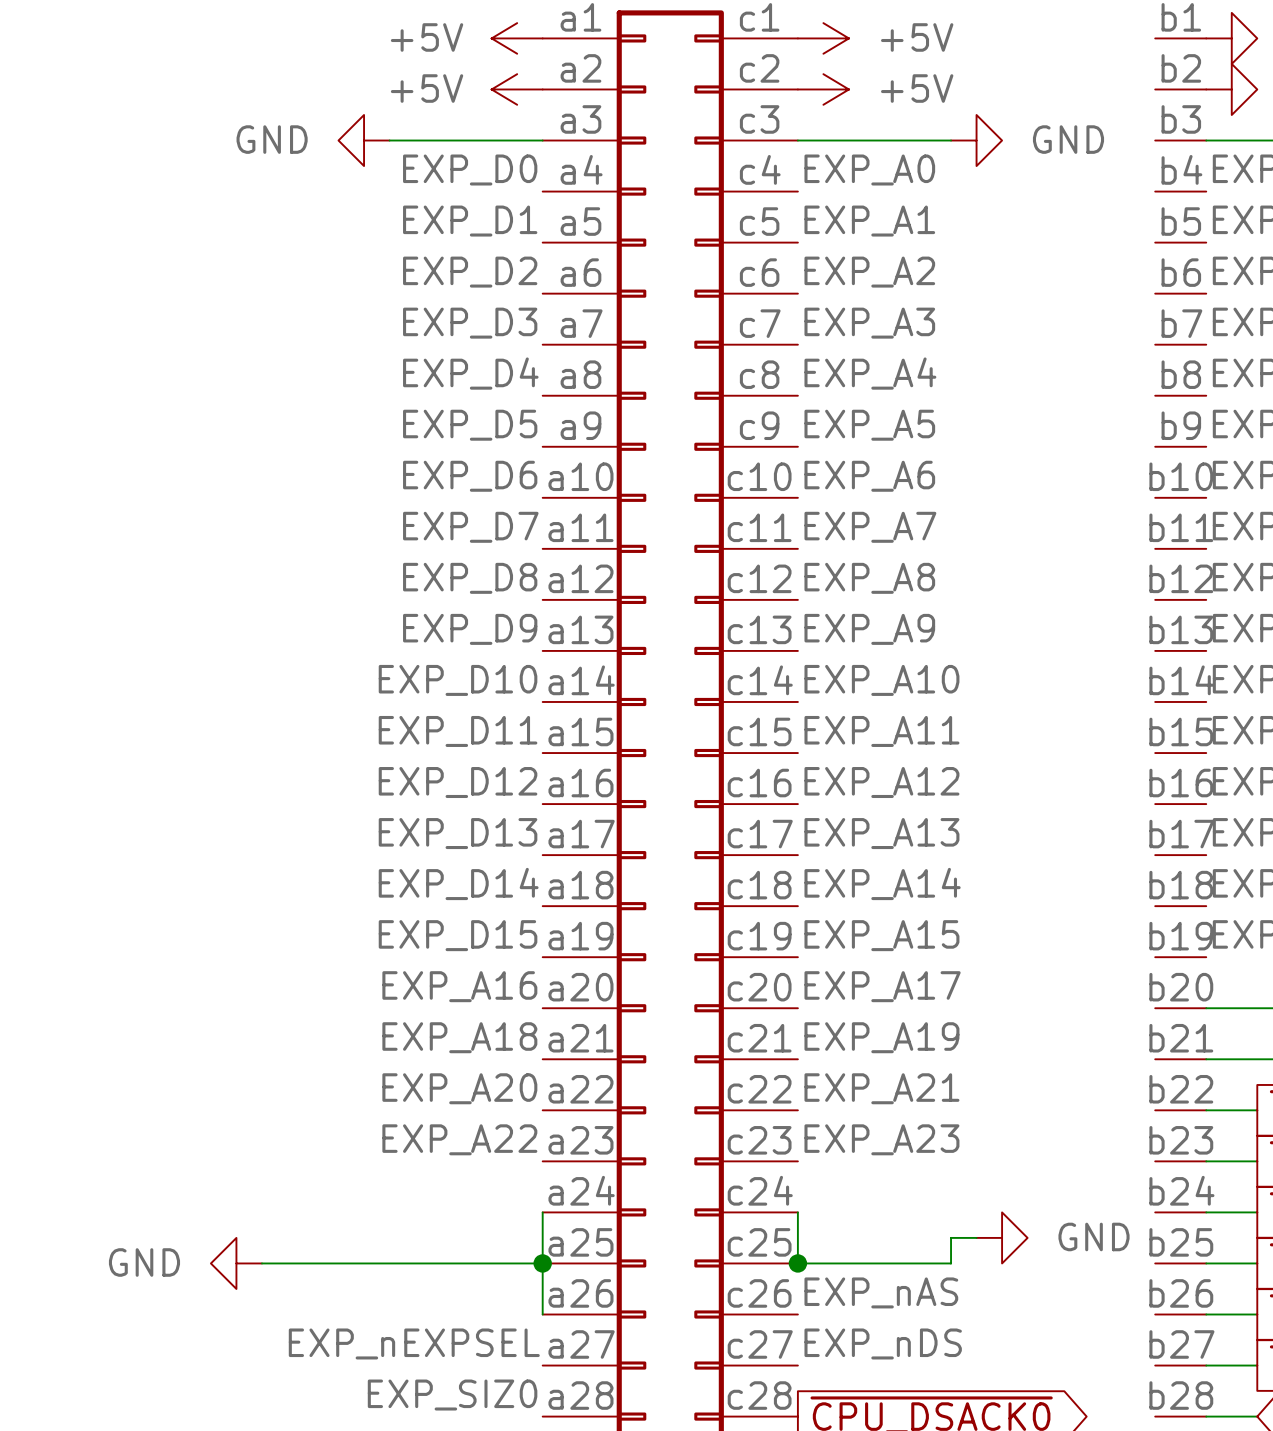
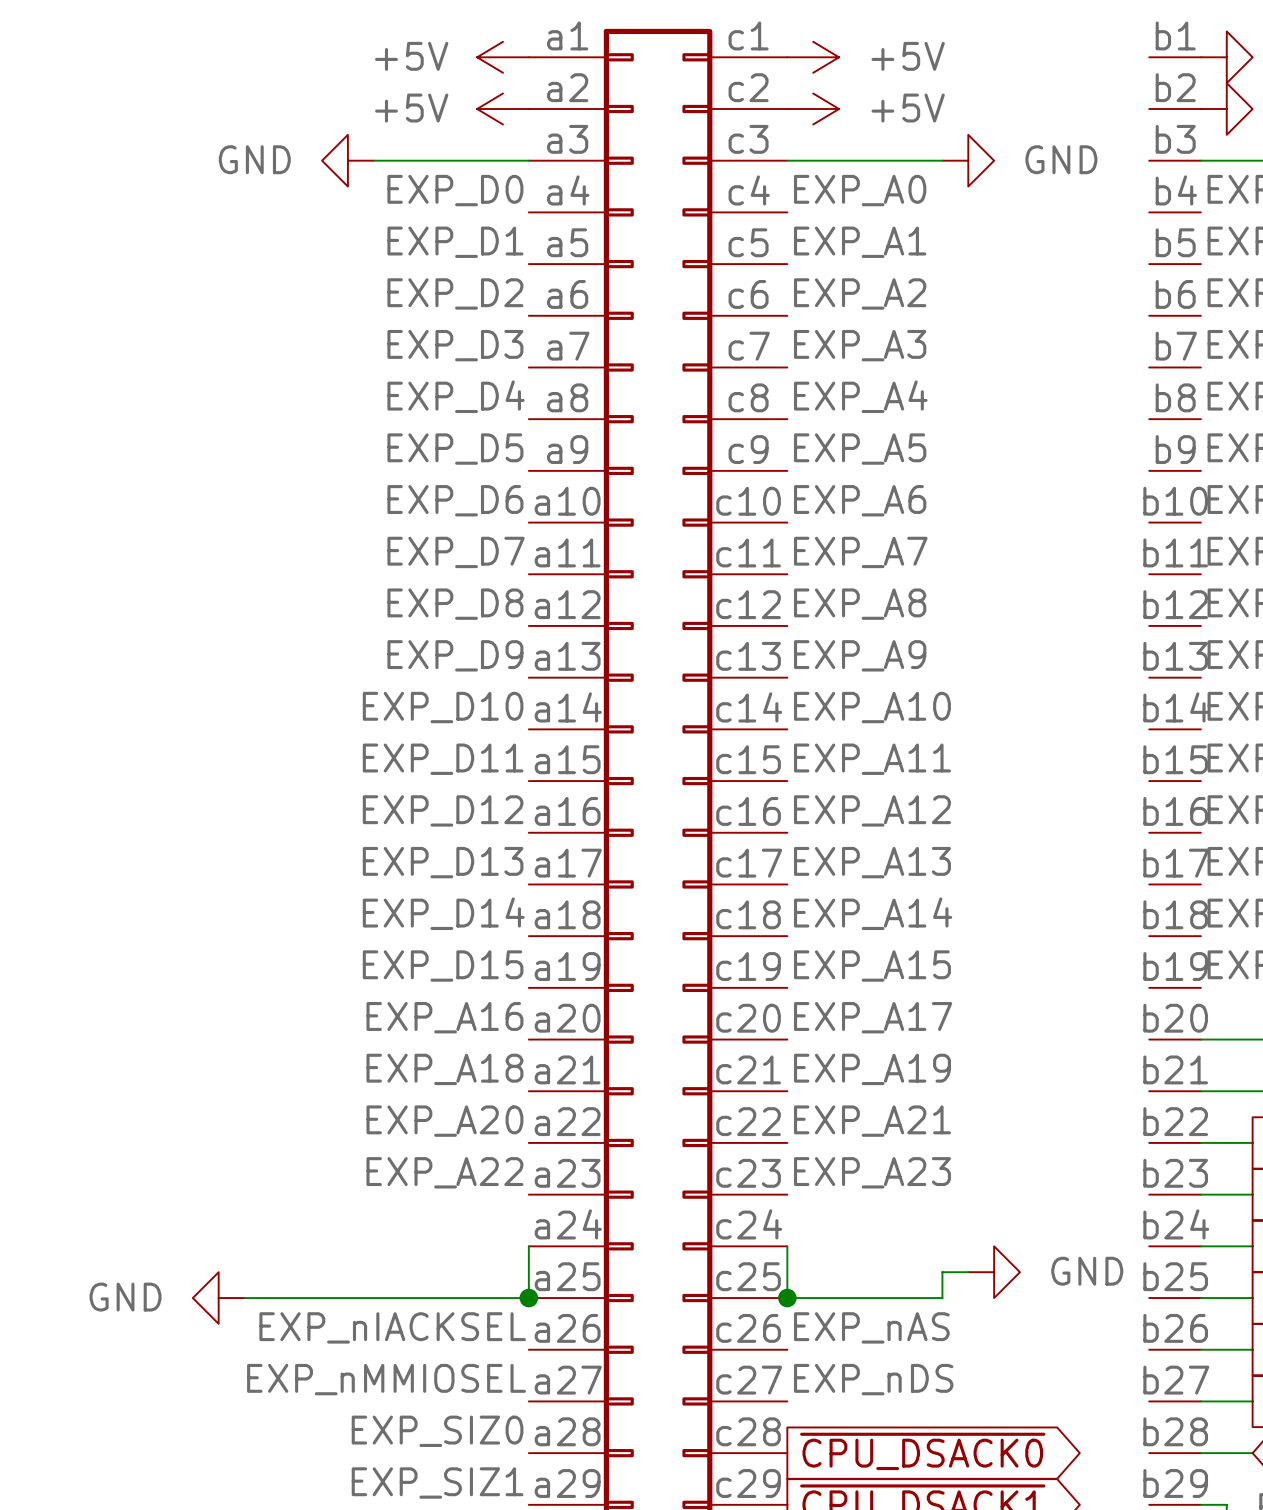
wire: (542, 1263) (542, 1314) -> none
label: none -> EXP_nIACKSEL (392, 1327)
label: EXP_nEXPSEL (414, 1343) -> EXP_nMMIOSEL (386, 1379)

